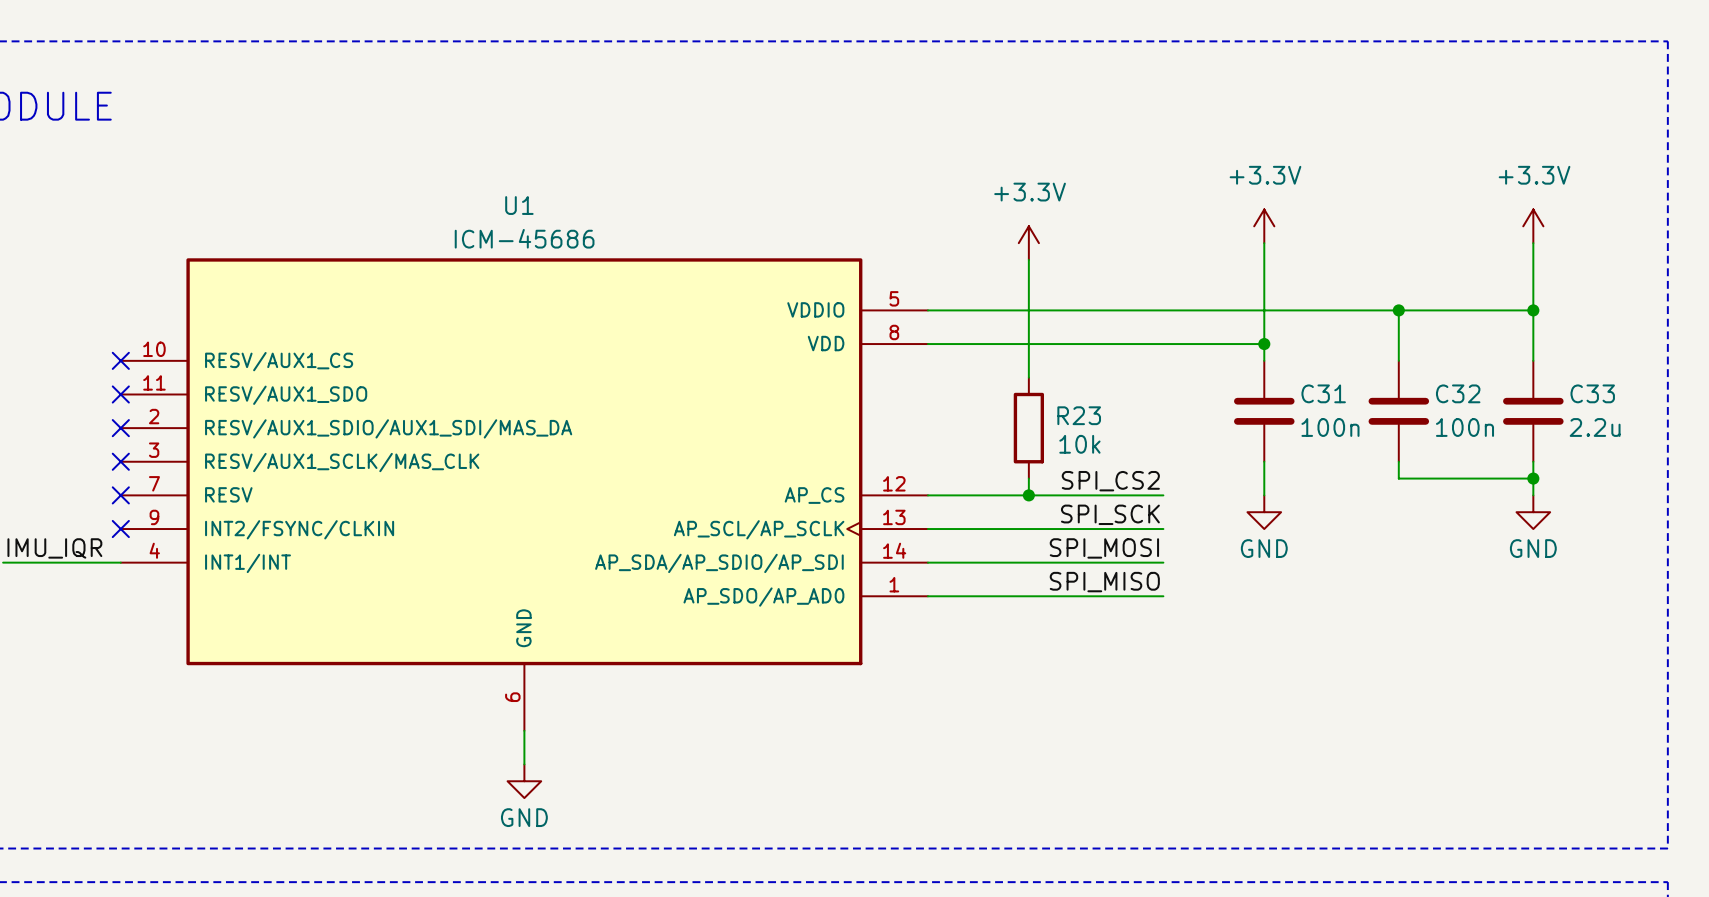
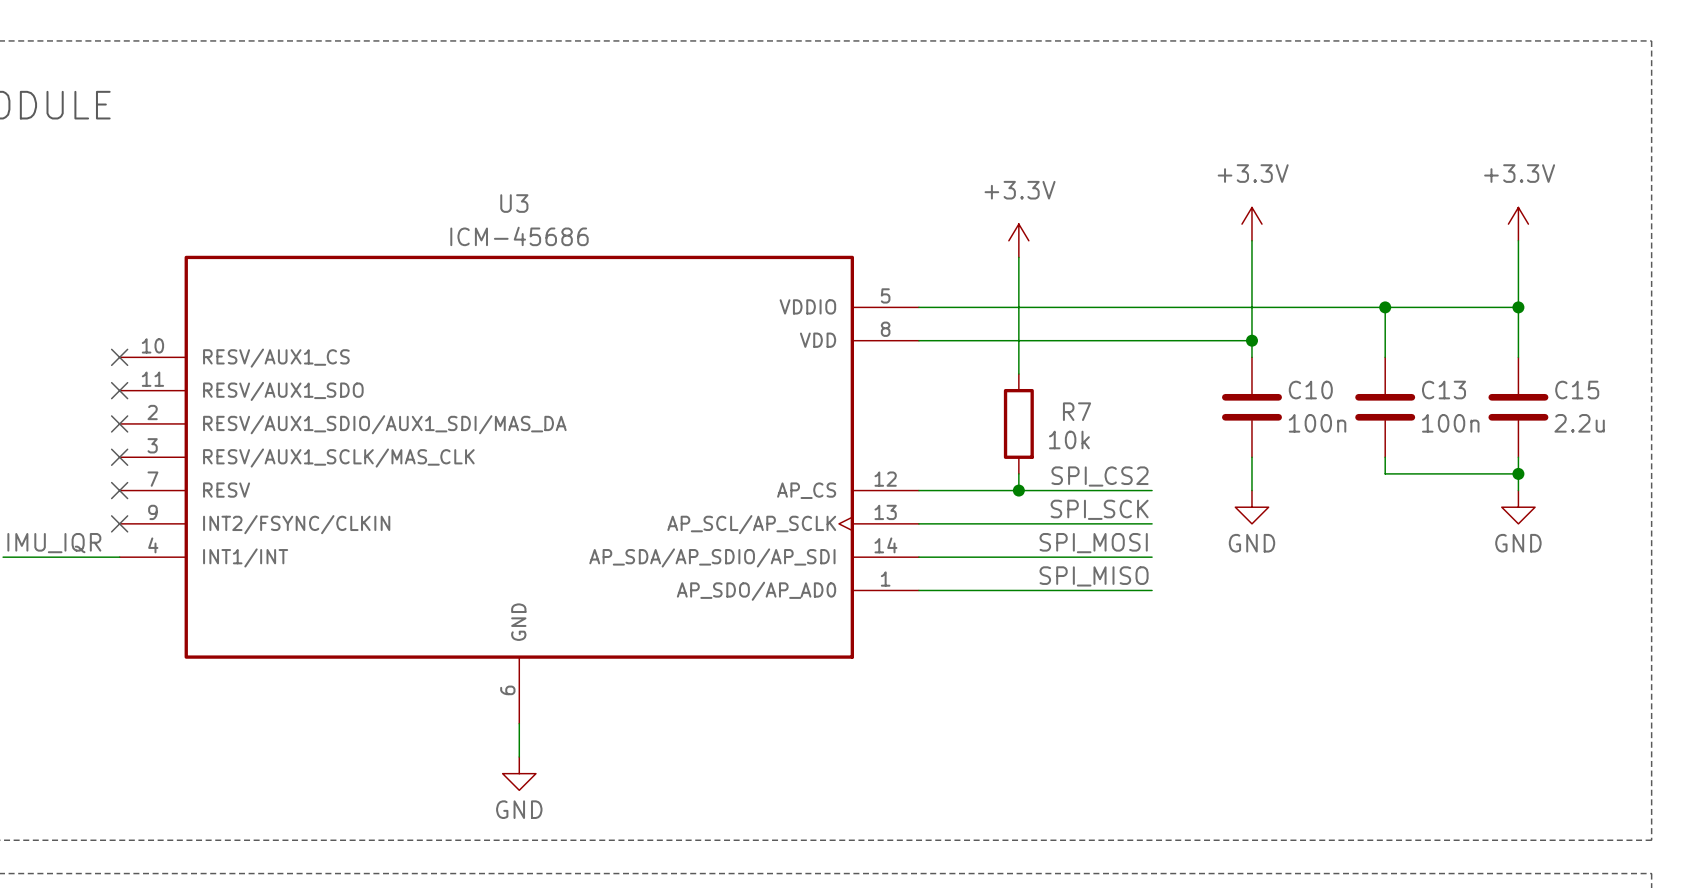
U1 name: U1 (519, 205) -> U3 (514, 203)
C31 name: C31 (1323, 393) -> C10 (1310, 390)
C32 name: C32 (1458, 393) -> C13 (1444, 390)
C33 name: C33 (1592, 393) -> C15 (1577, 390)
R23 name: R23 (1079, 415) -> R7 (1077, 411)

